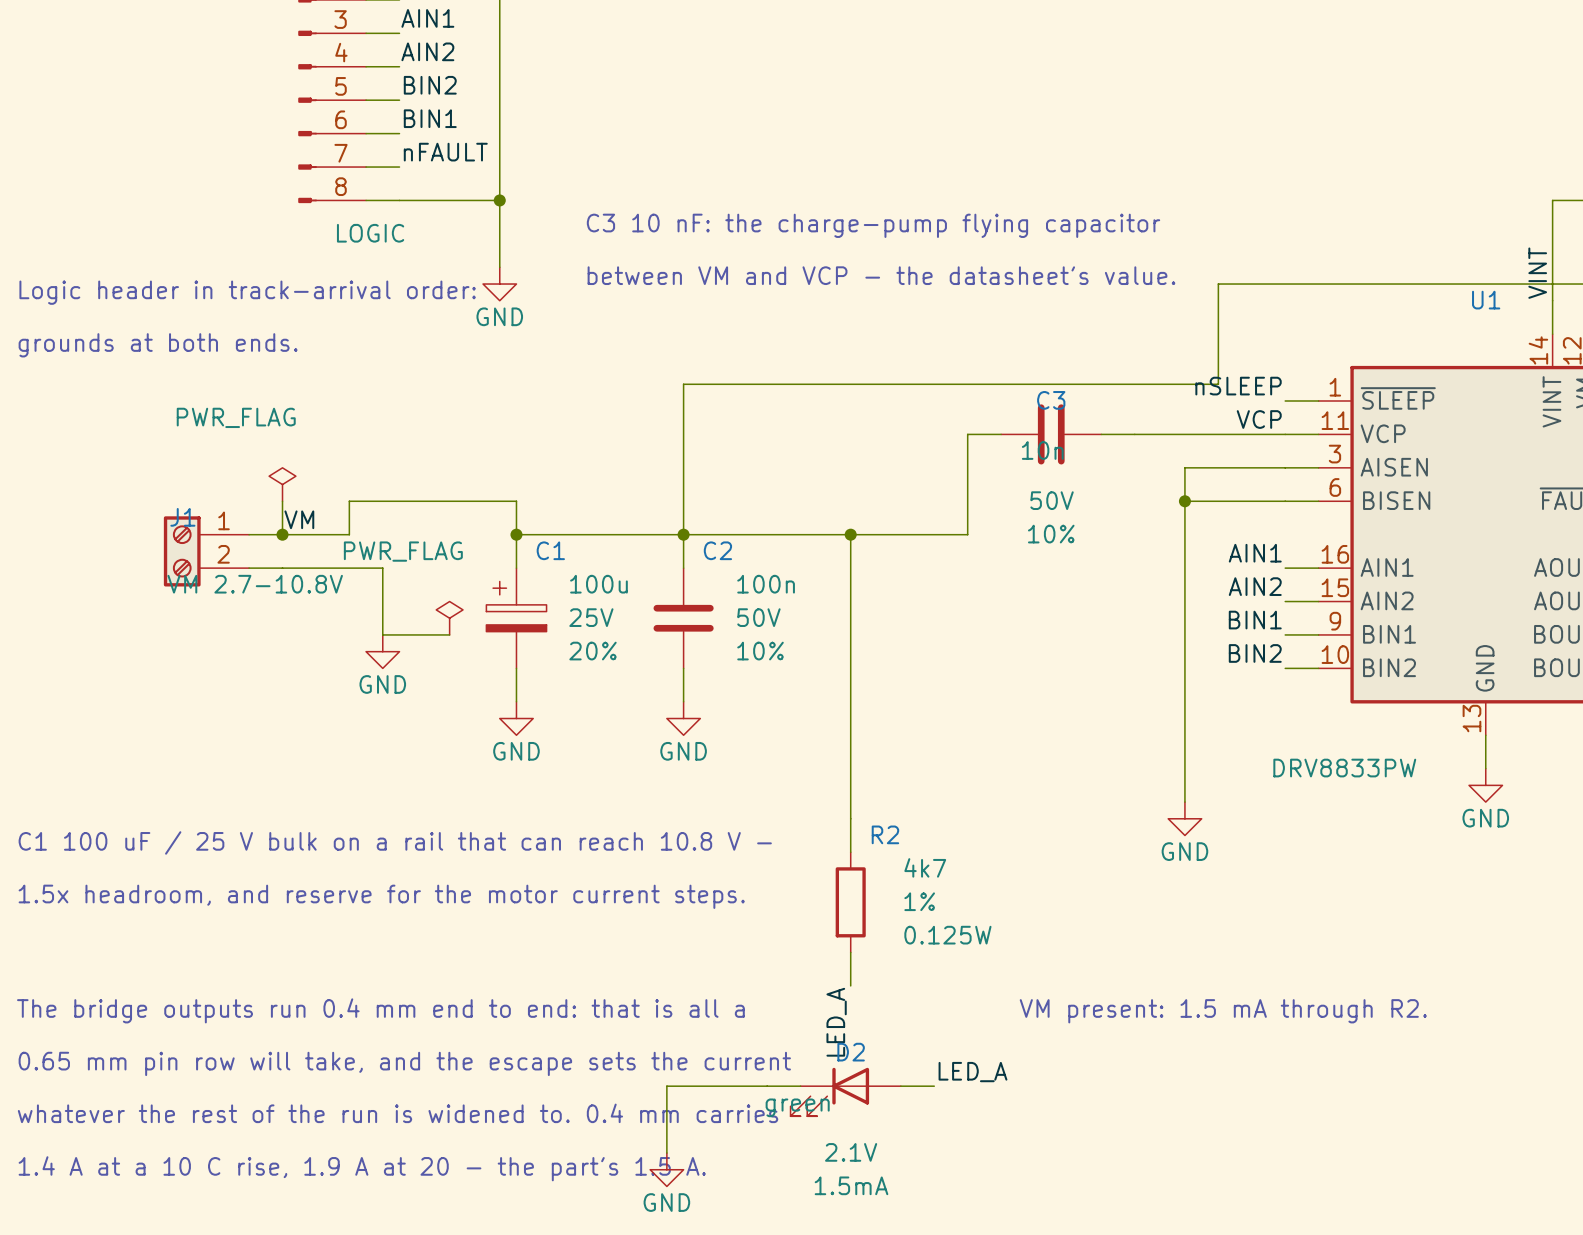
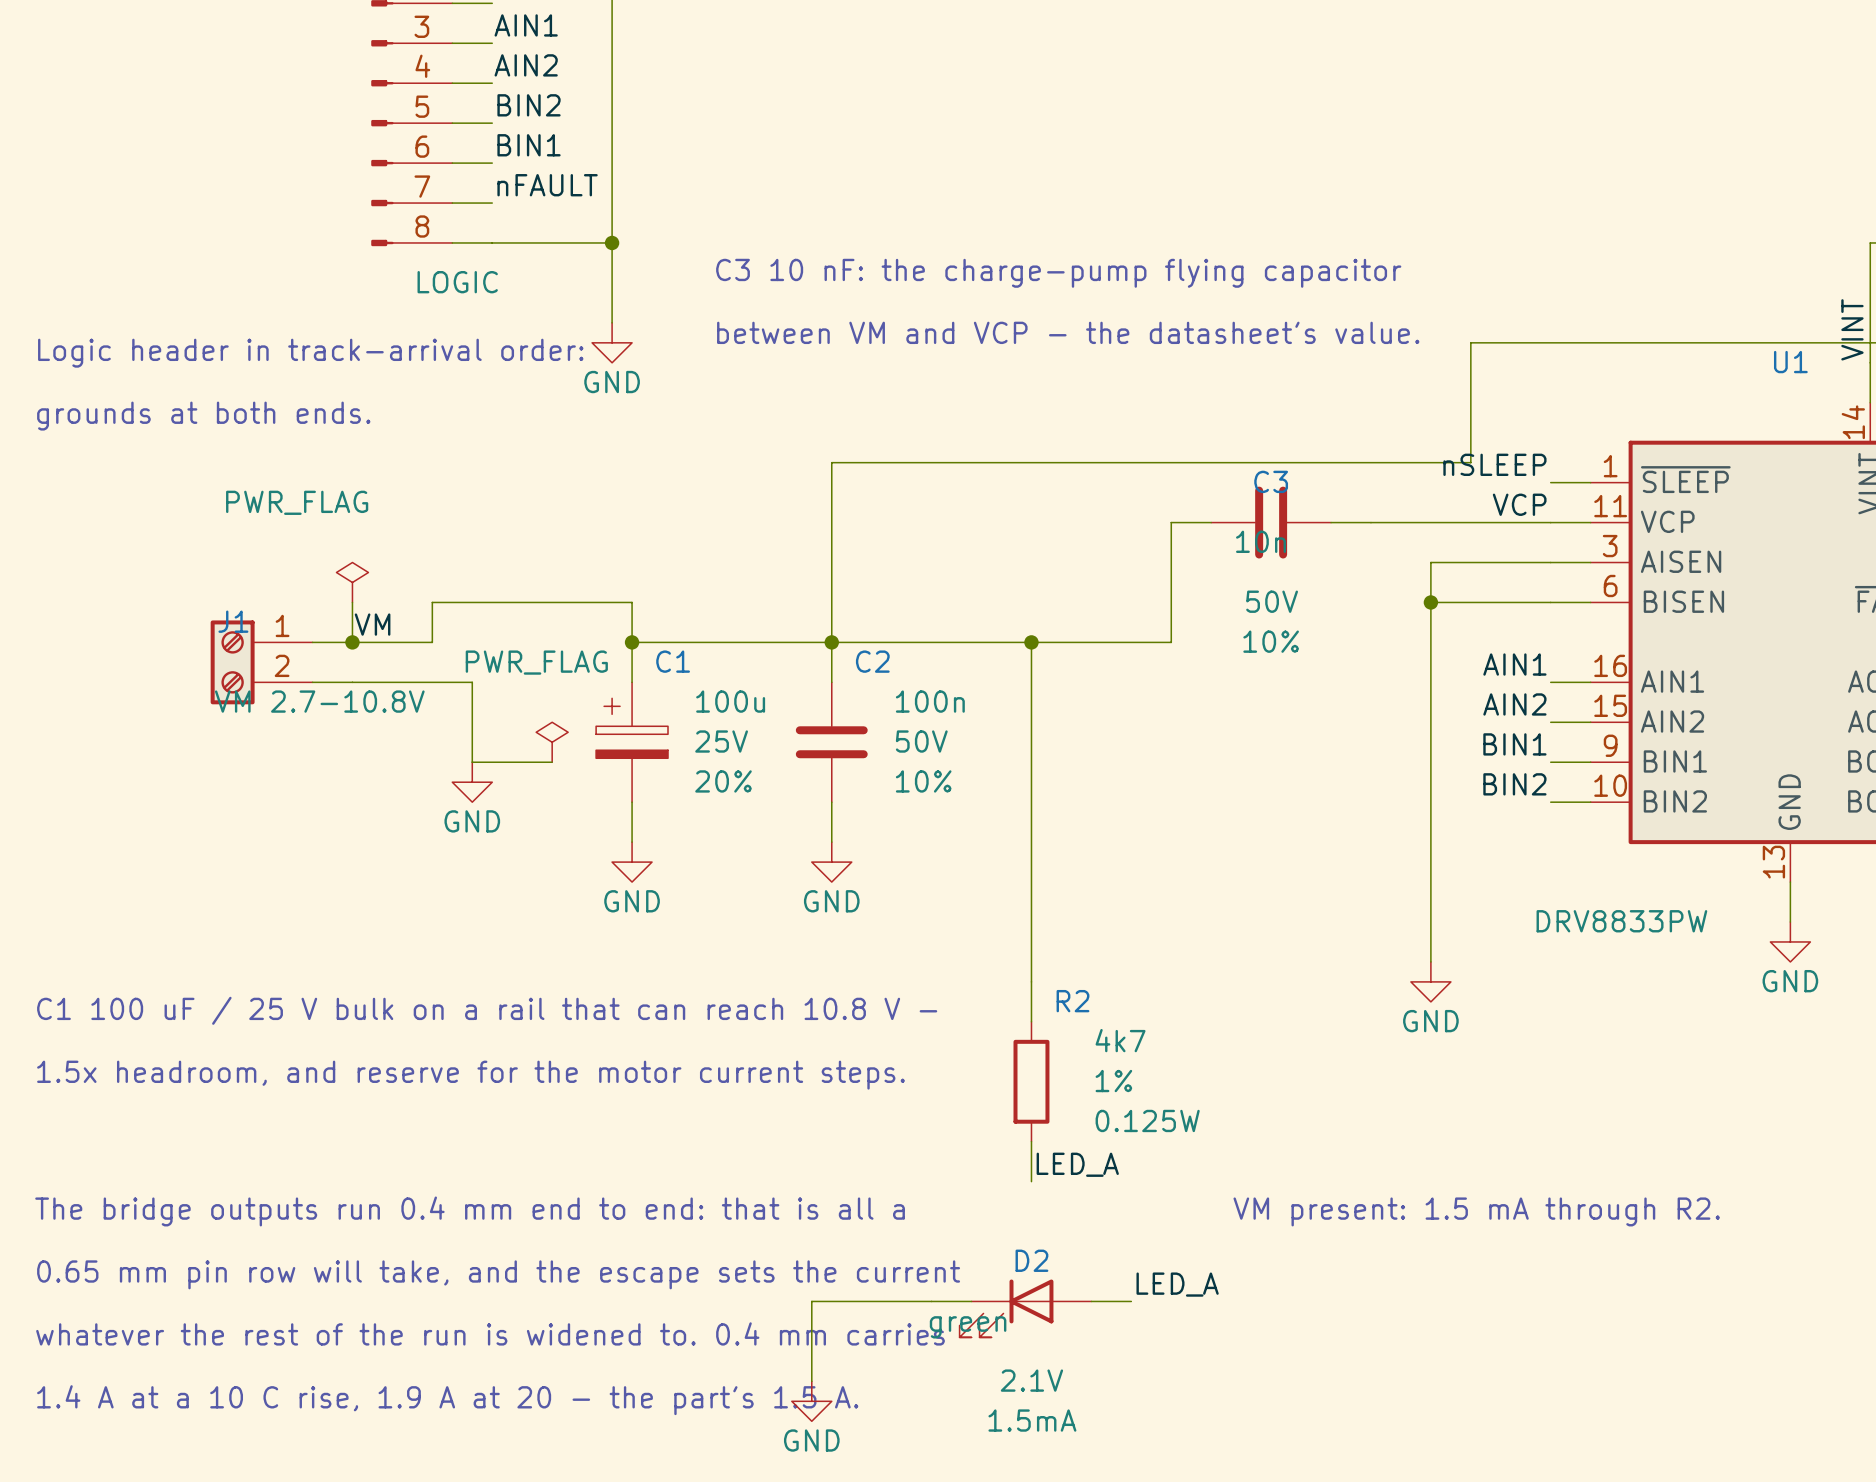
power symbol text position: PWR_FLAG (403, 551) -> PWR_FLAG (536, 662)
label rotation: 0° (836, 1022) -> 90° clockwise (1077, 1164)

